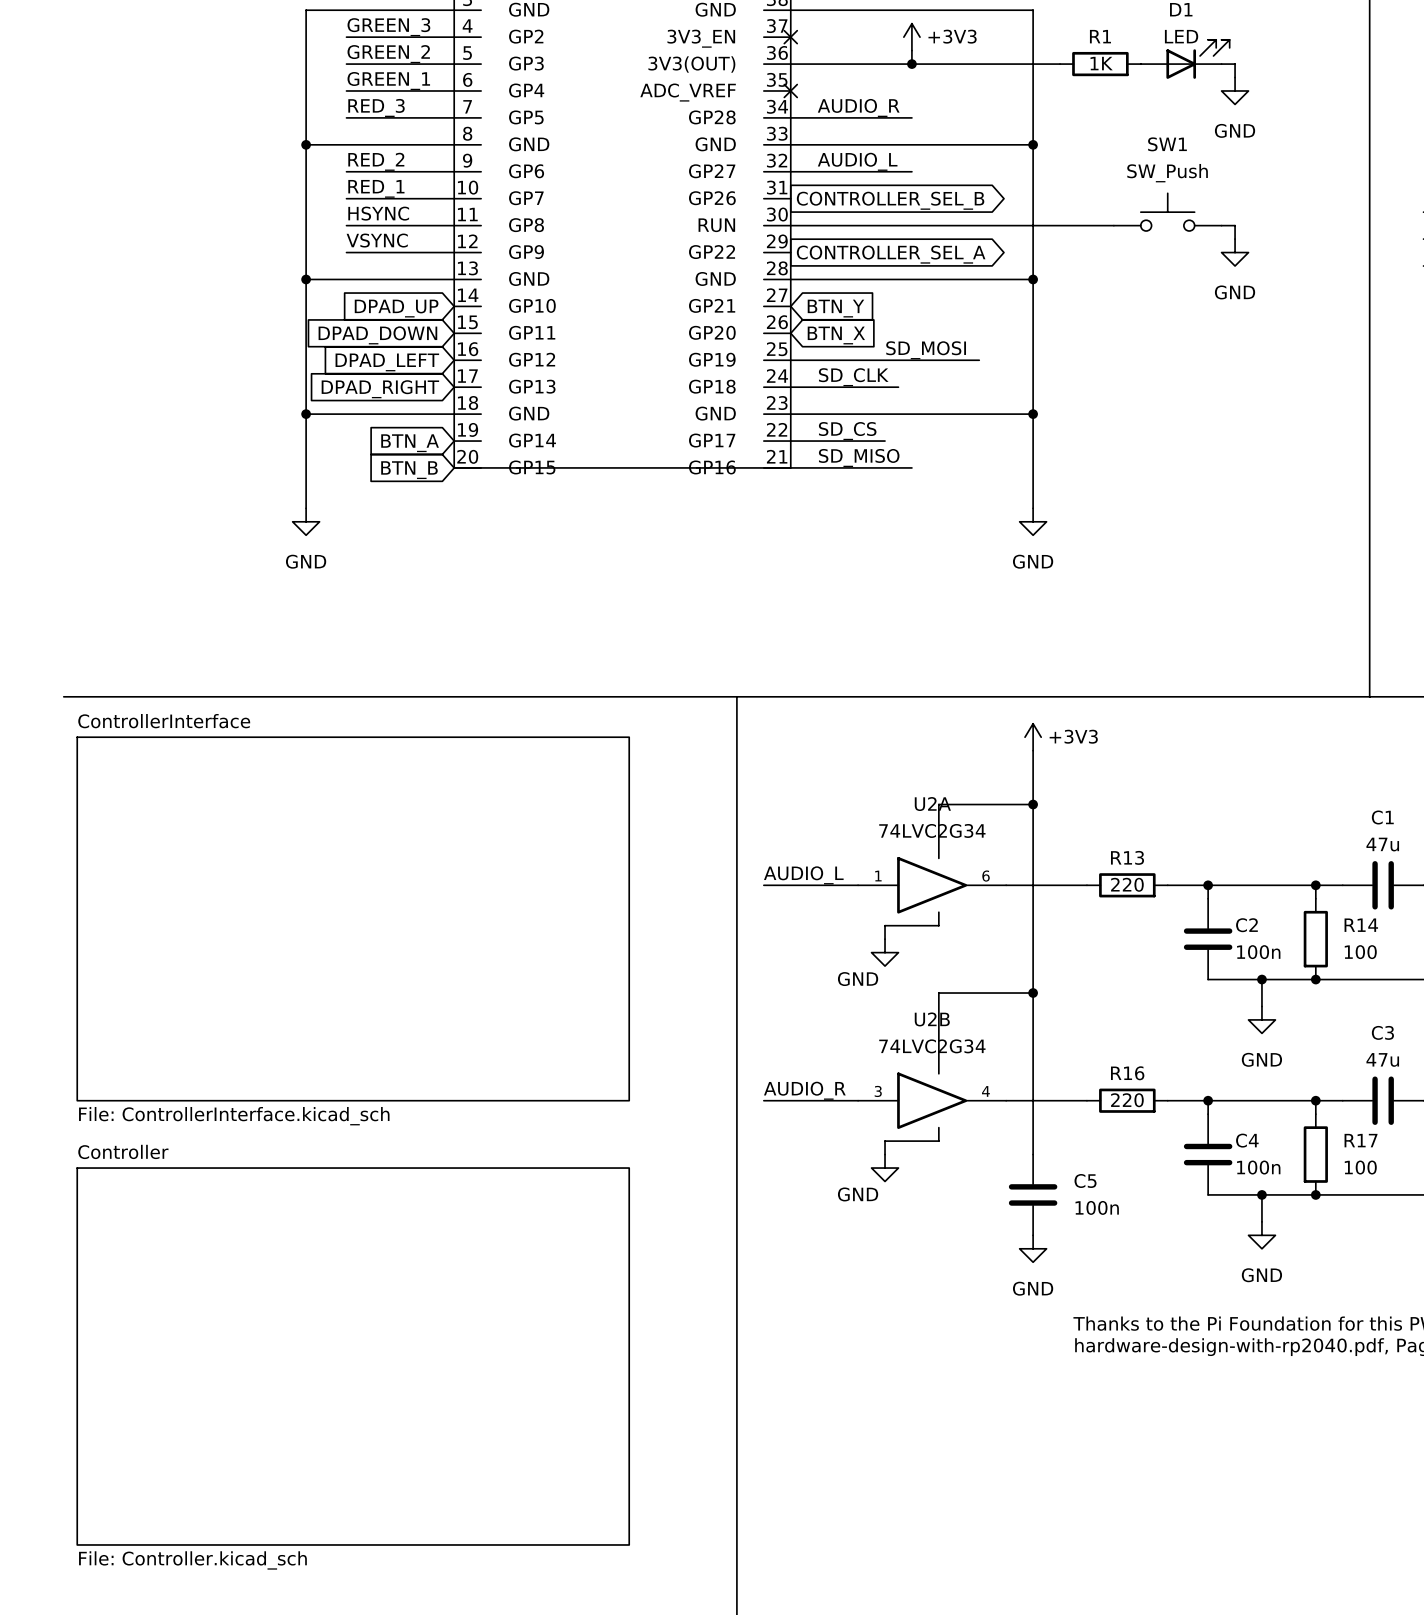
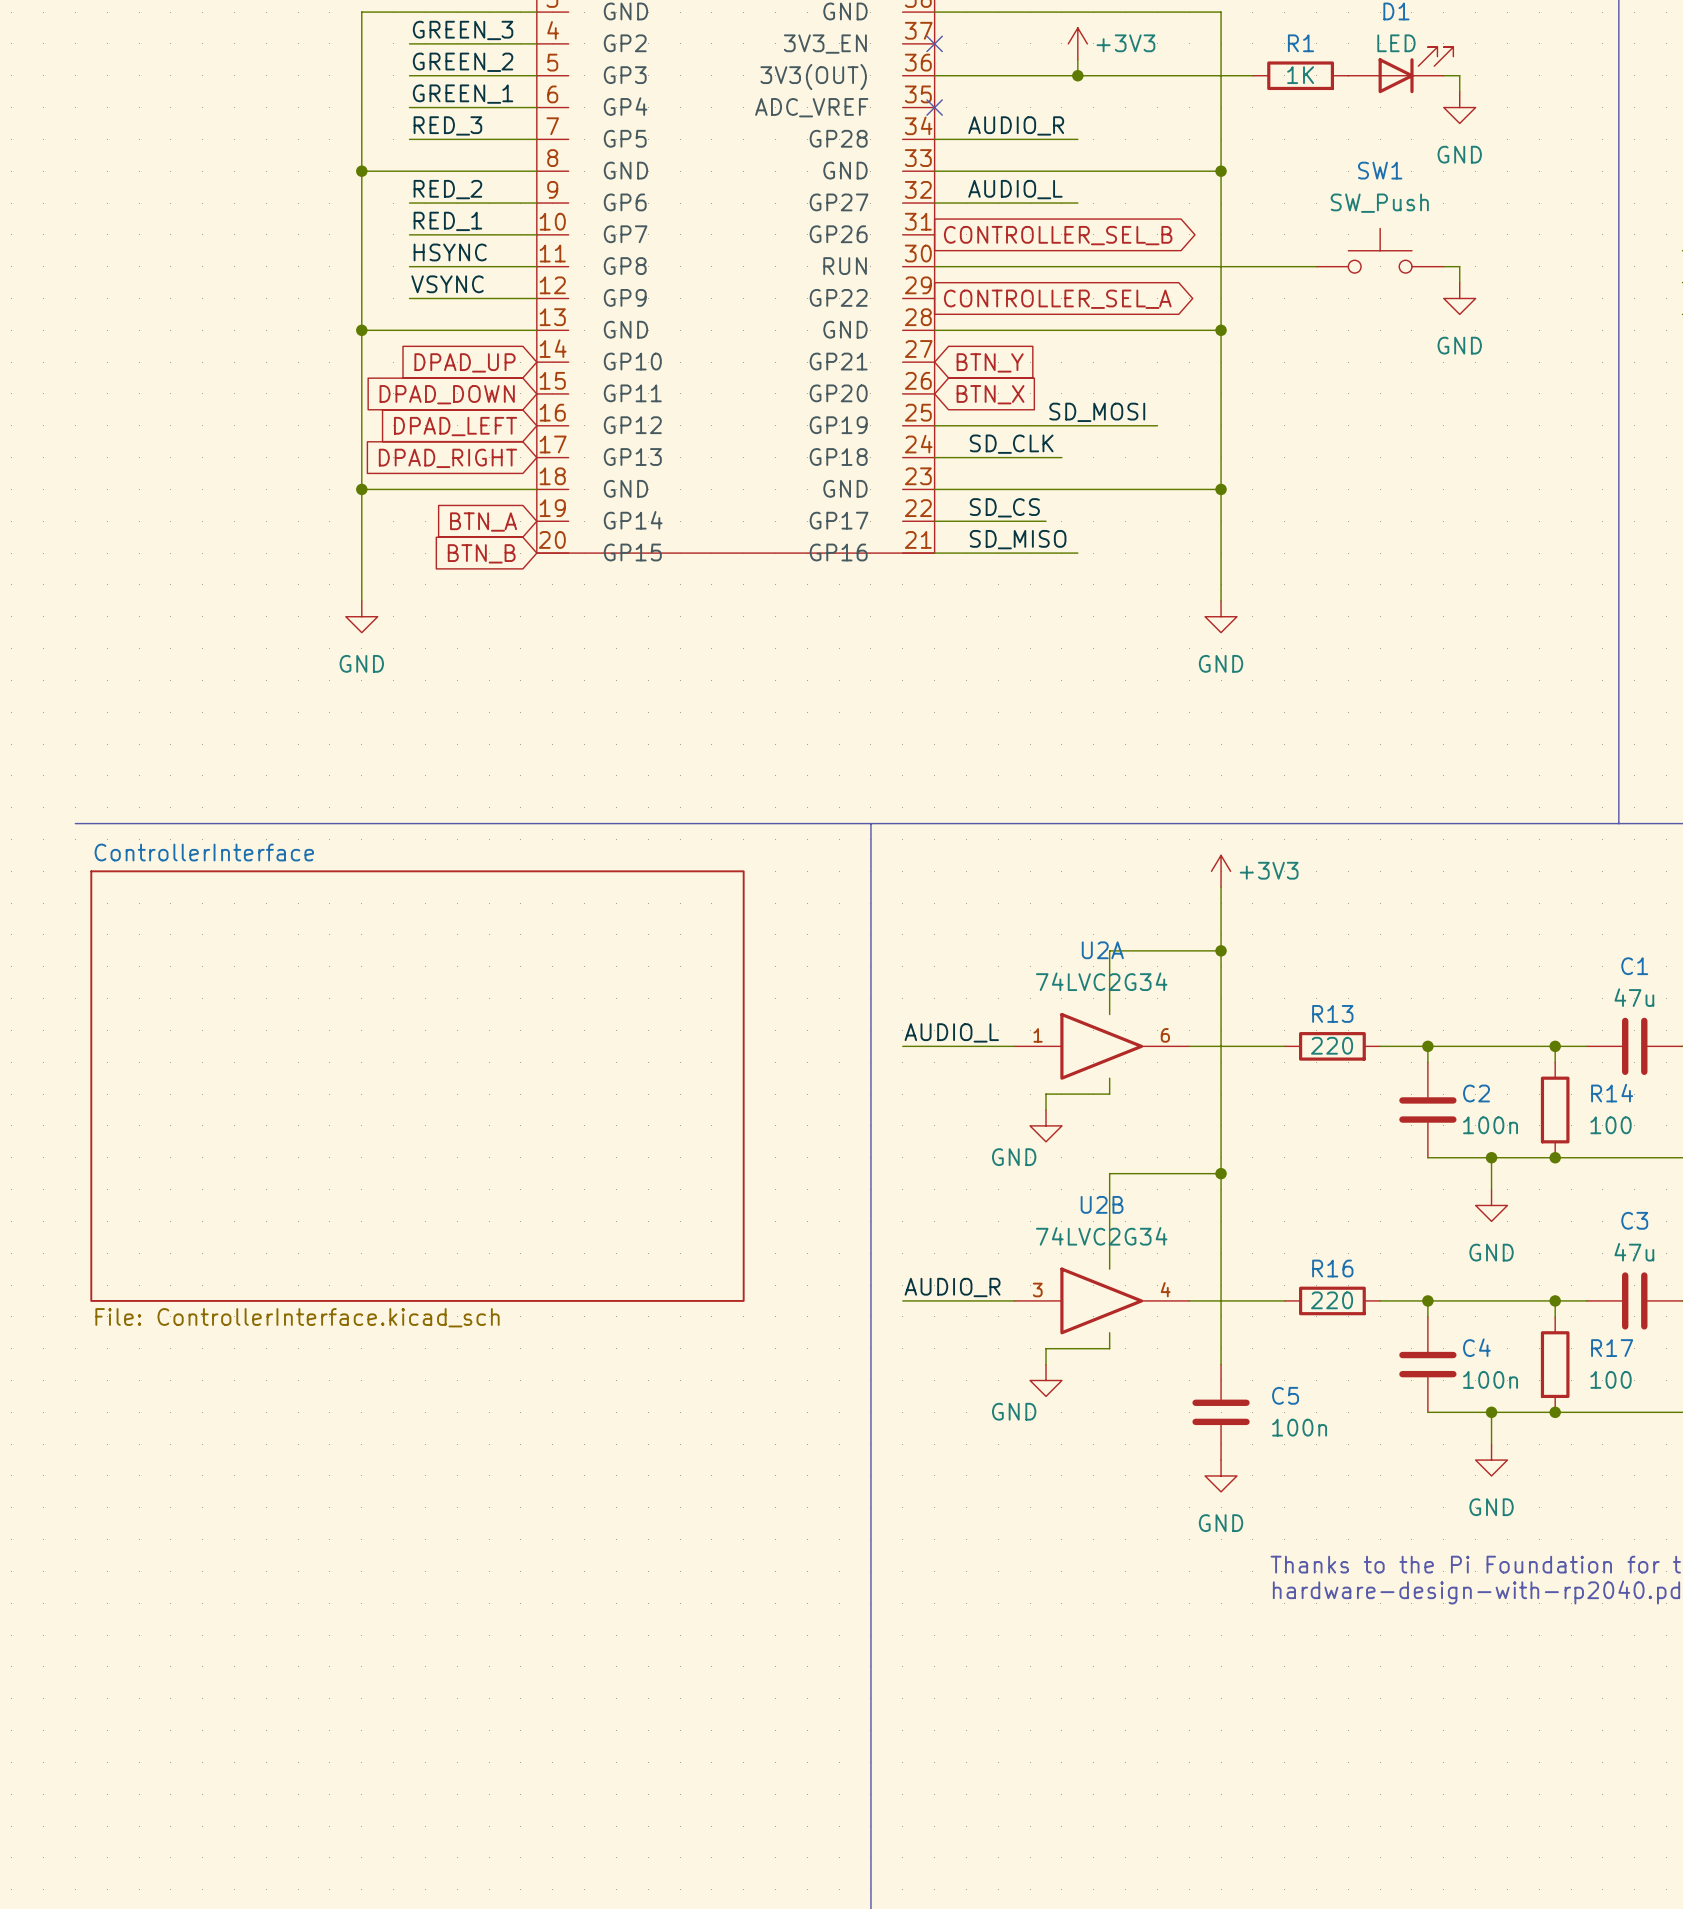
sheet Controller: File: Controller.kicad_sch (353, 1356) -> none

